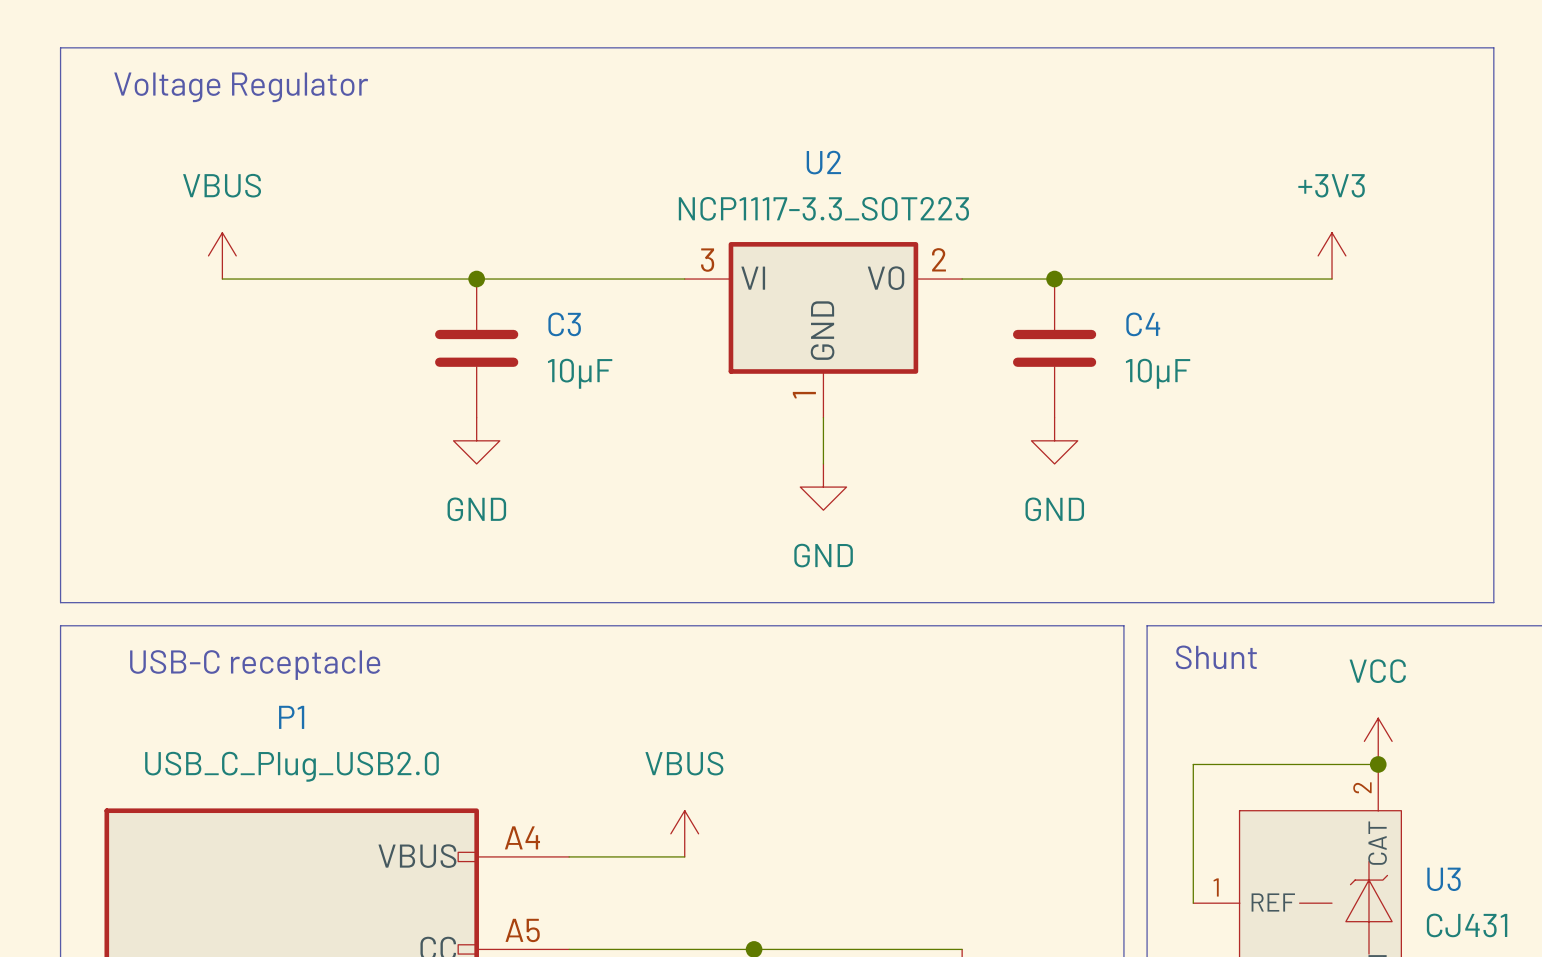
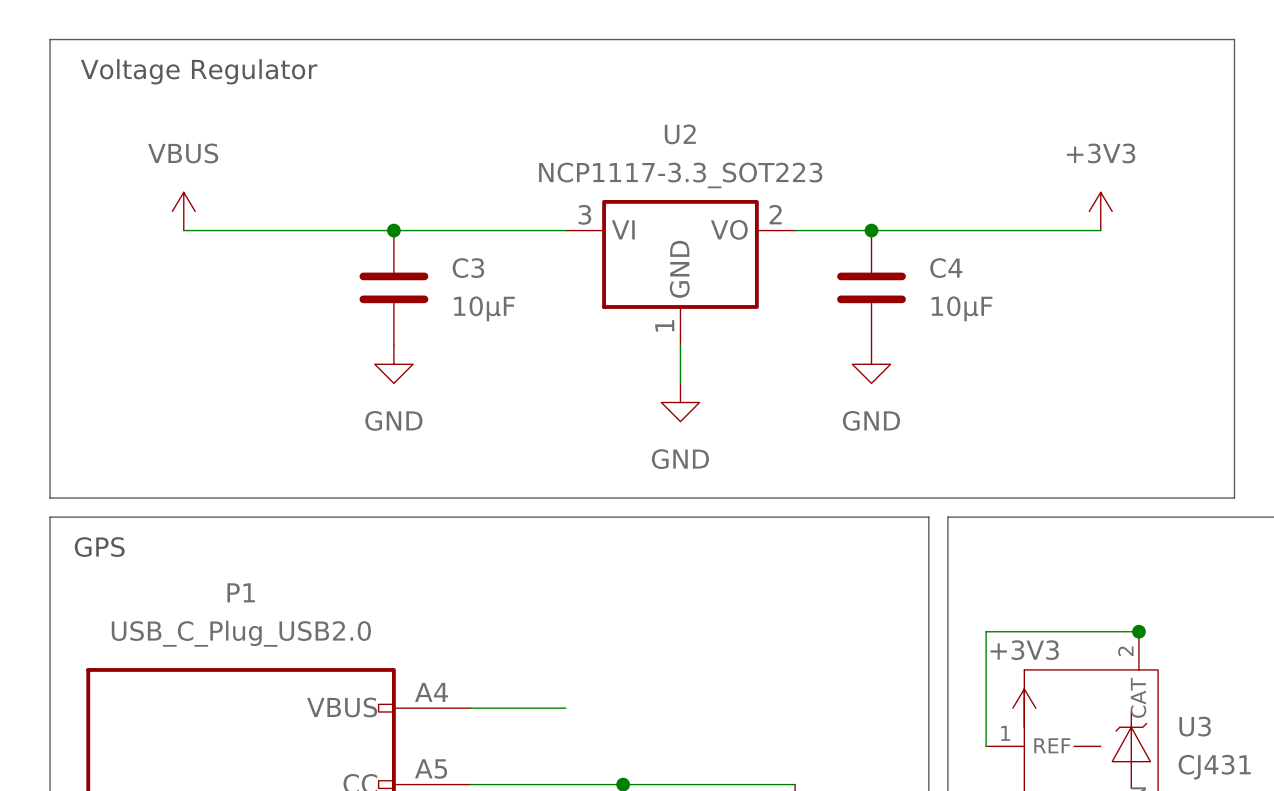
text: Shunt (1216, 657) -> none
text: none -> GPS (99, 547)
text: USB-C receptacle (255, 665) -> none
power symbol: VCC (1378, 741) -> none
power symbol: VBUS (684, 833) -> none
power symbol: none -> +3V3 (1024, 708)

